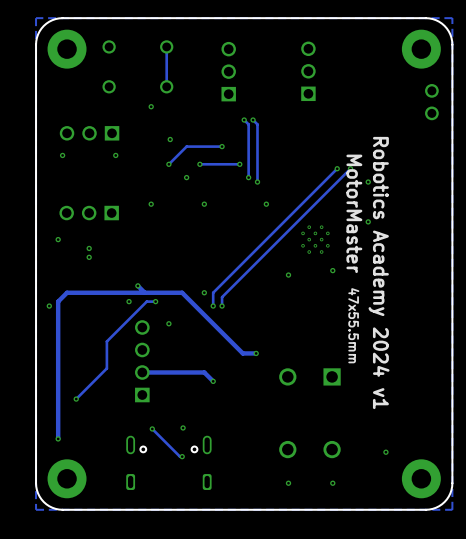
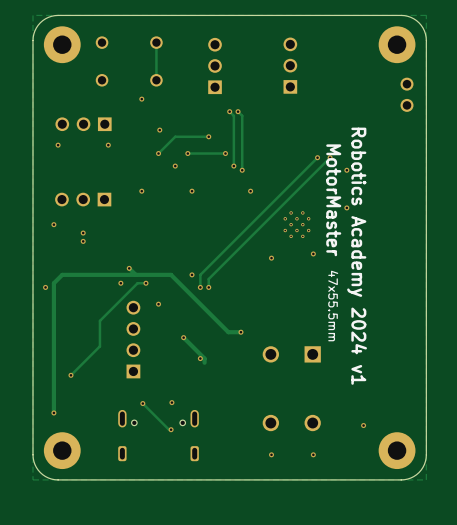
track: none -> (183, 337) (204, 358) (204, 362)
via: none -> (183, 337)
track: (142, 372) (204, 372) (213, 381) -> none

